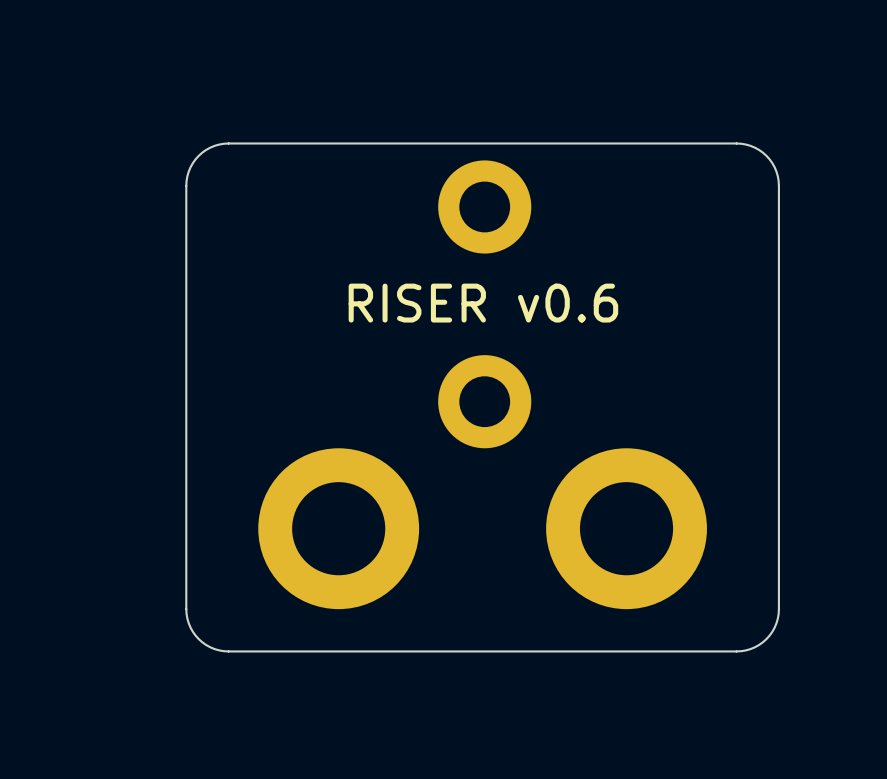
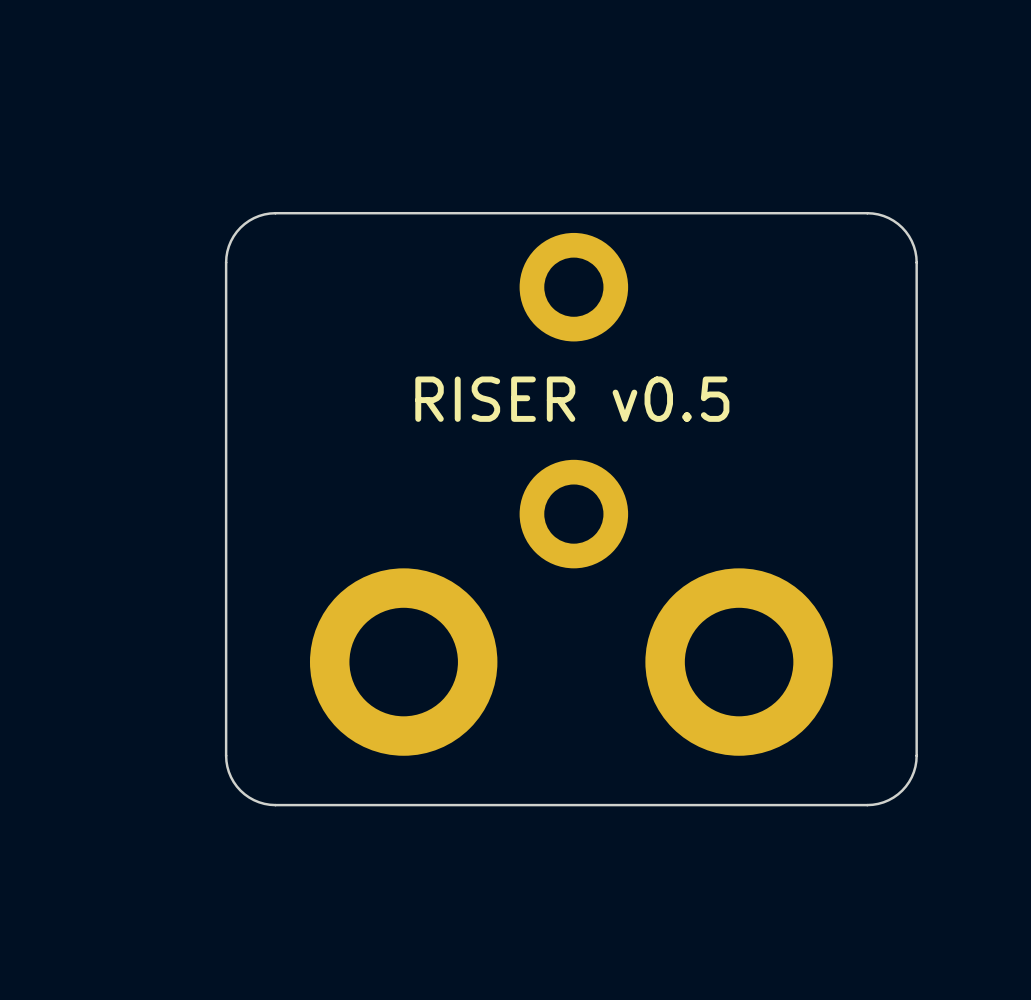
text: RISER v0.6 (483, 303) -> RISER v0.5 (572, 399)

